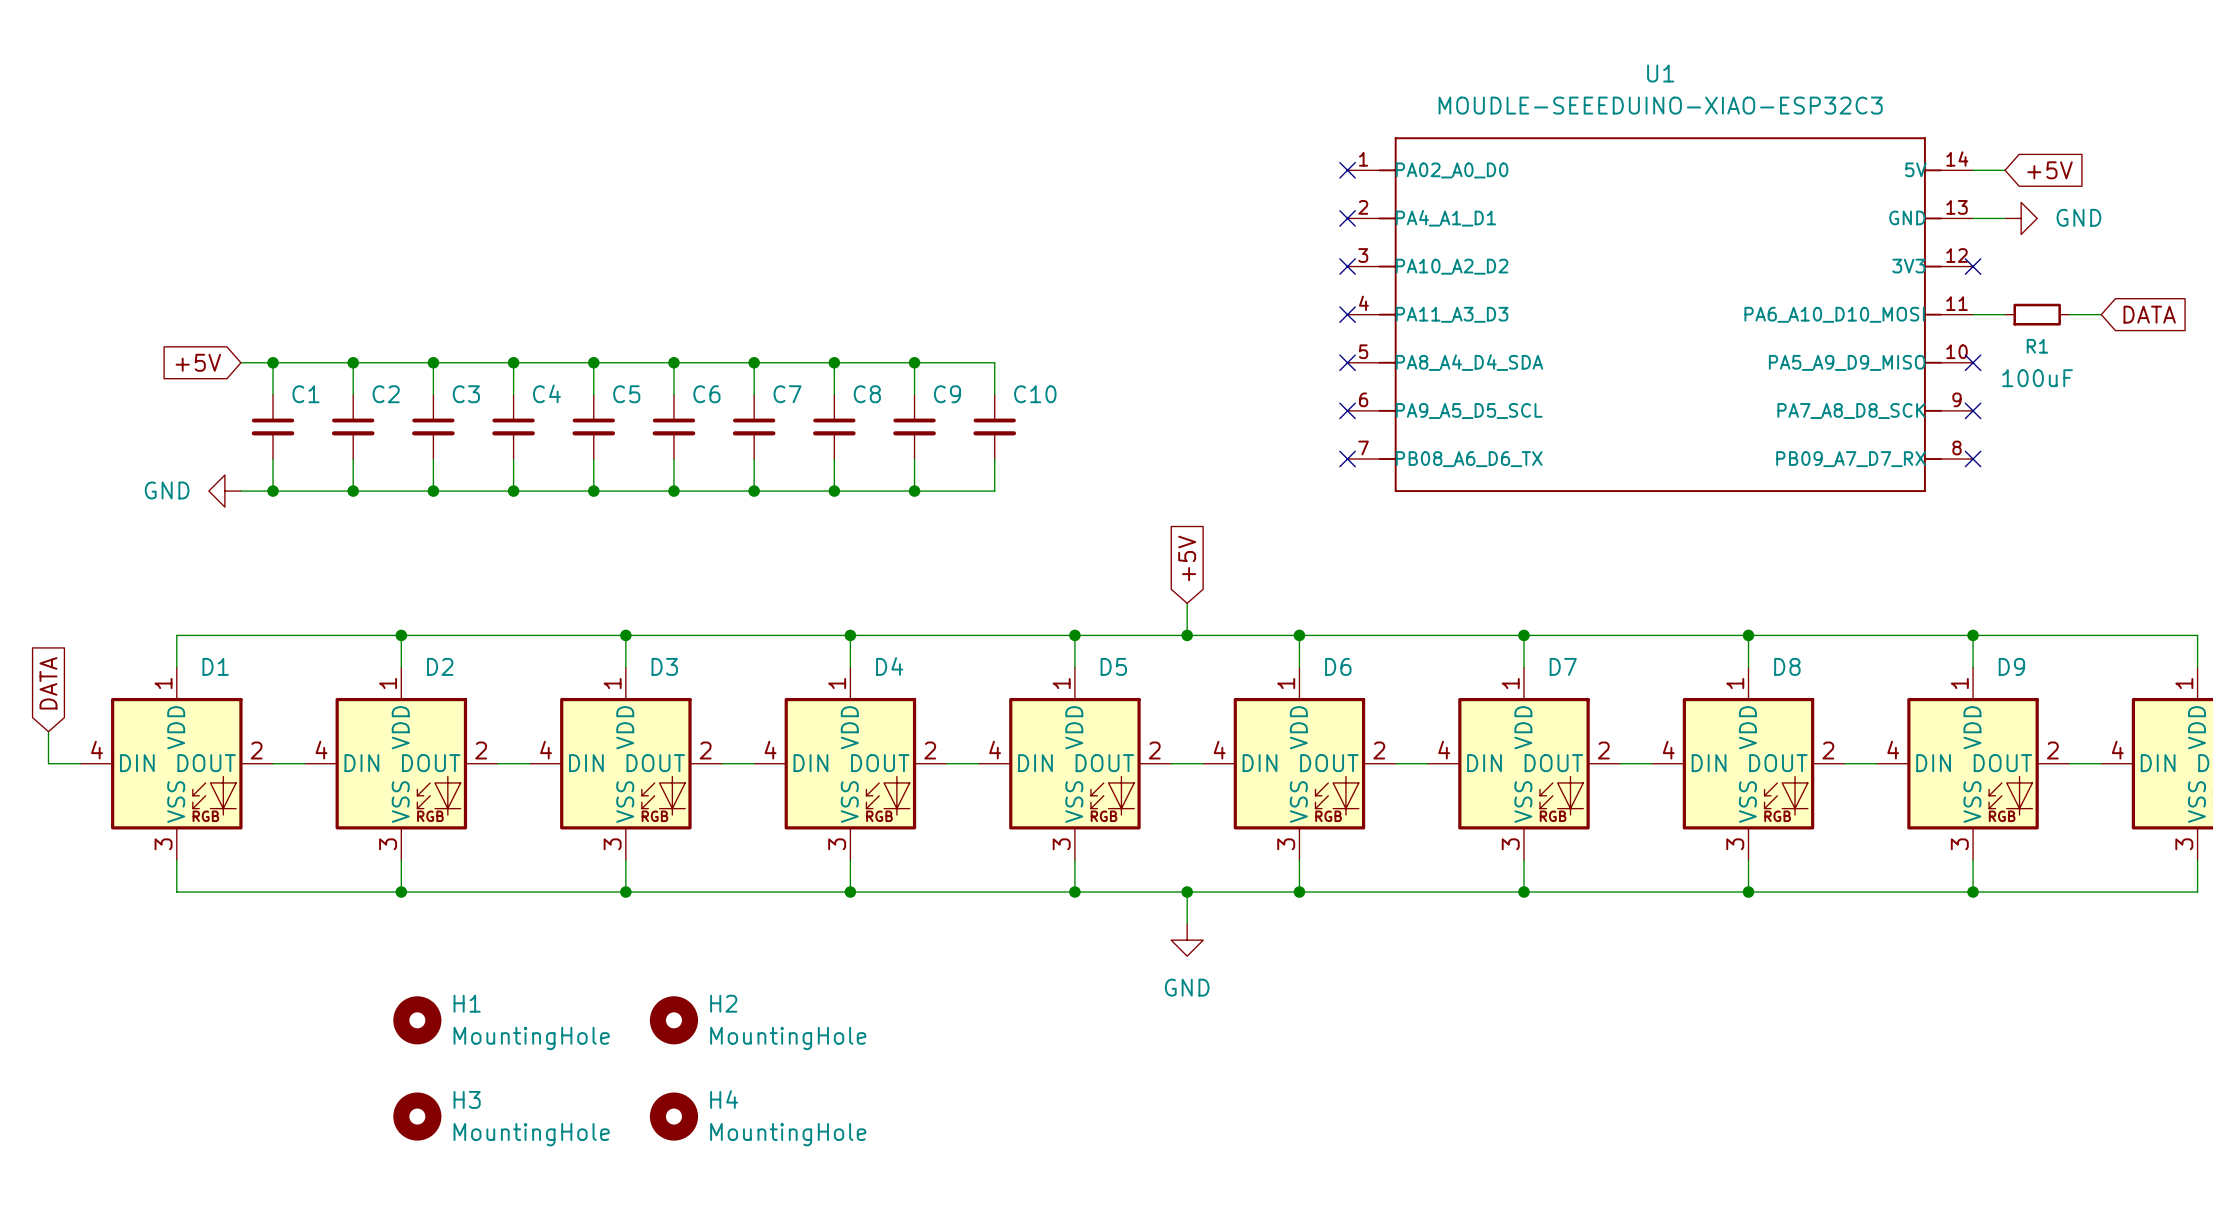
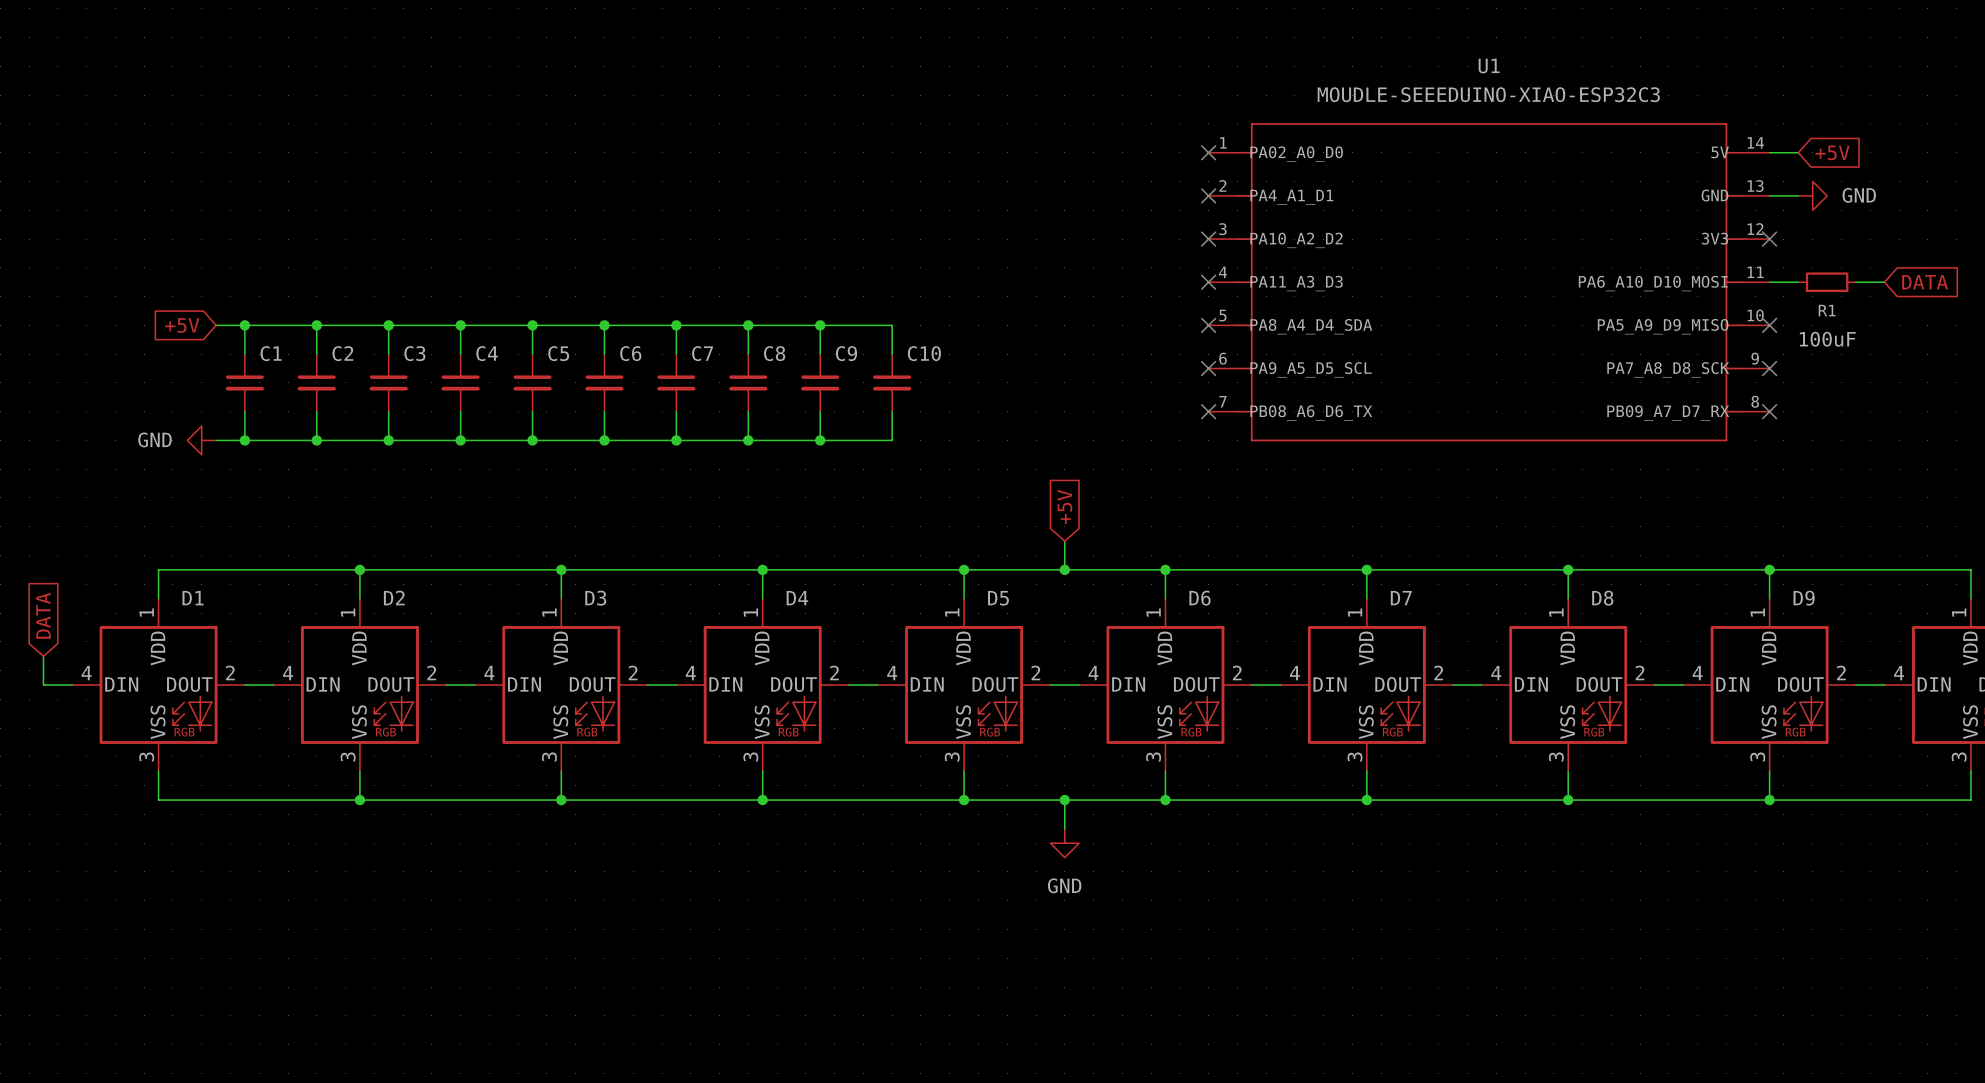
H1: MountingHole (417, 1020) -> none
H2: MountingHole (673, 1020) -> none
H3: MountingHole (417, 1116) -> none
H4: MountingHole (673, 1116) -> none

